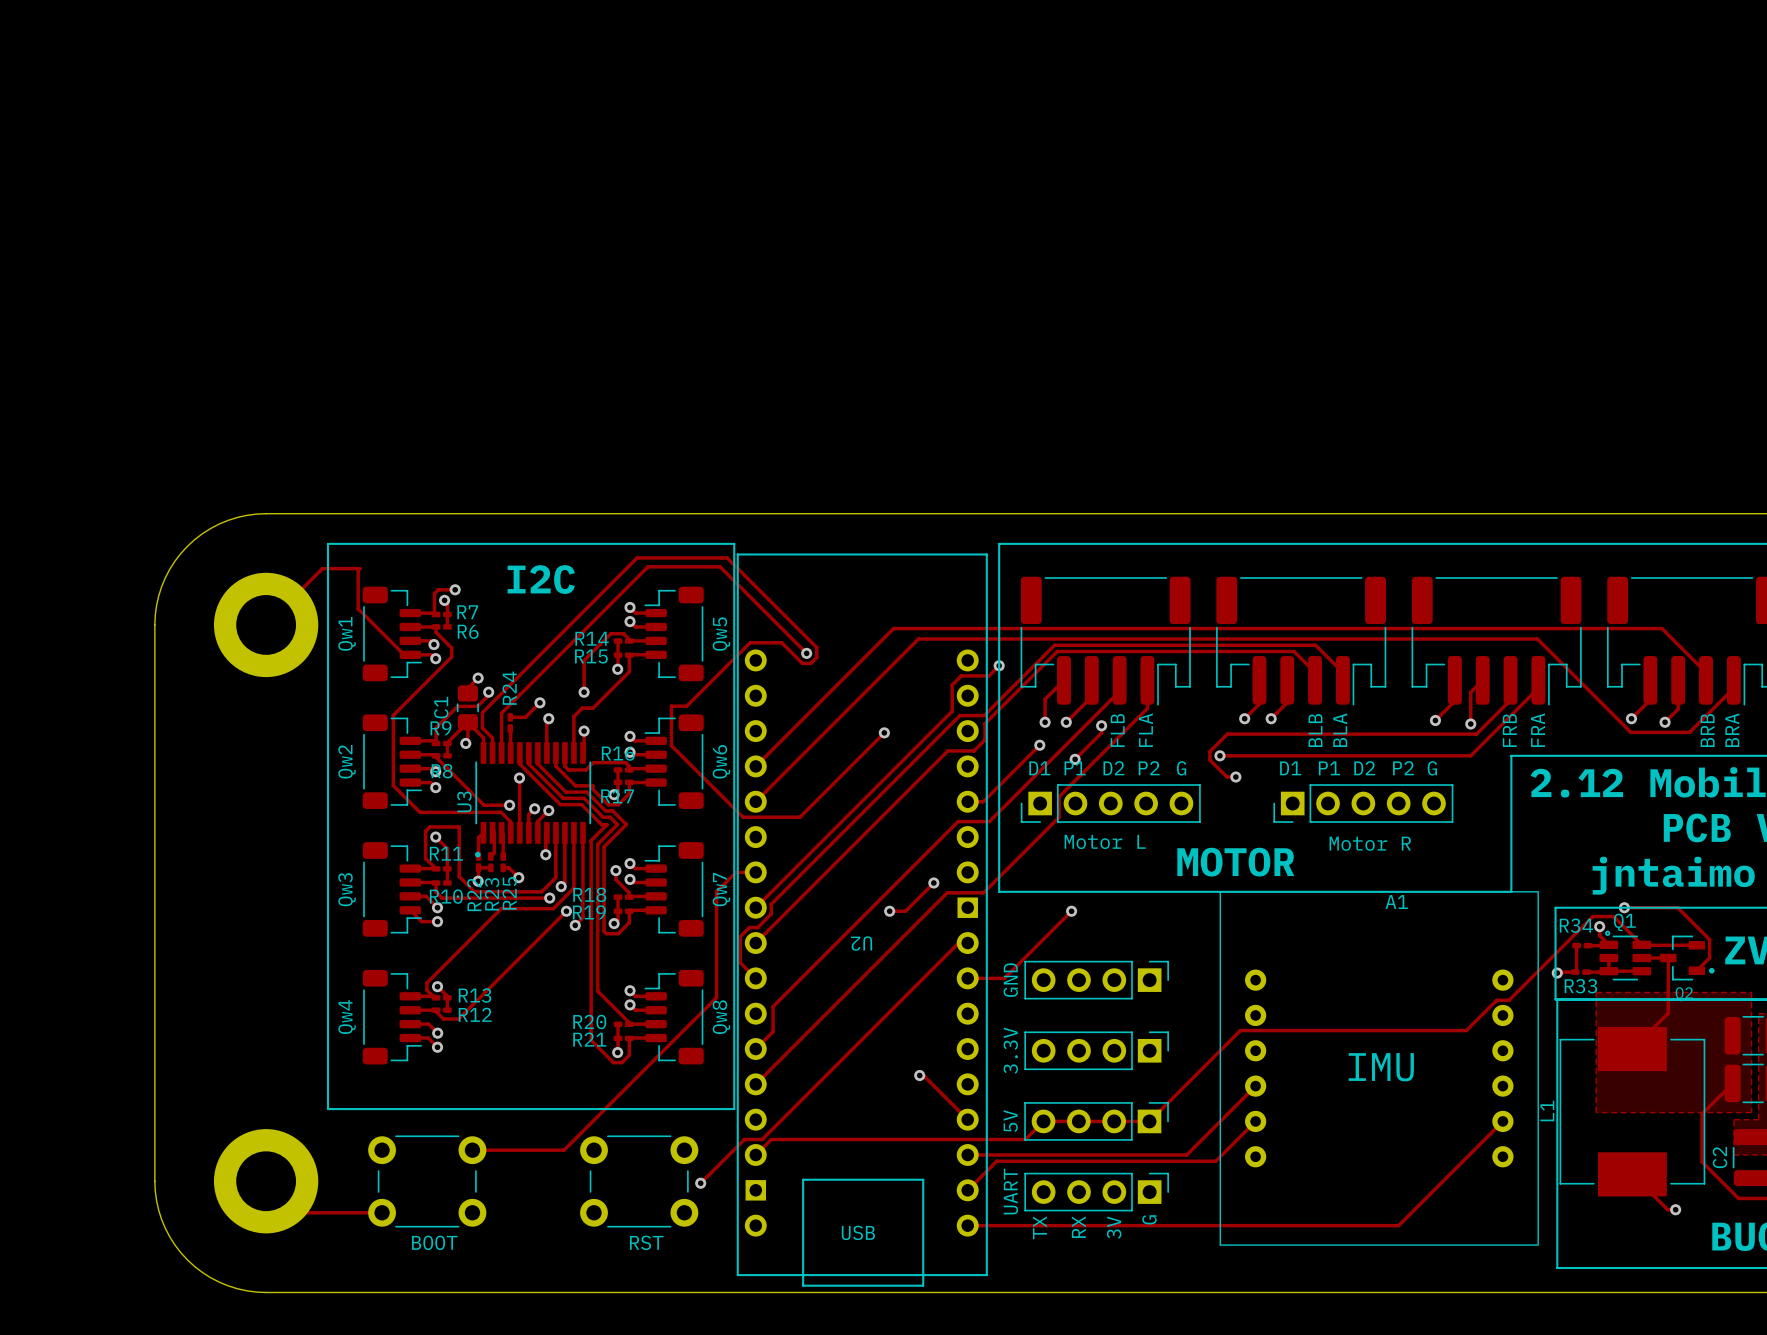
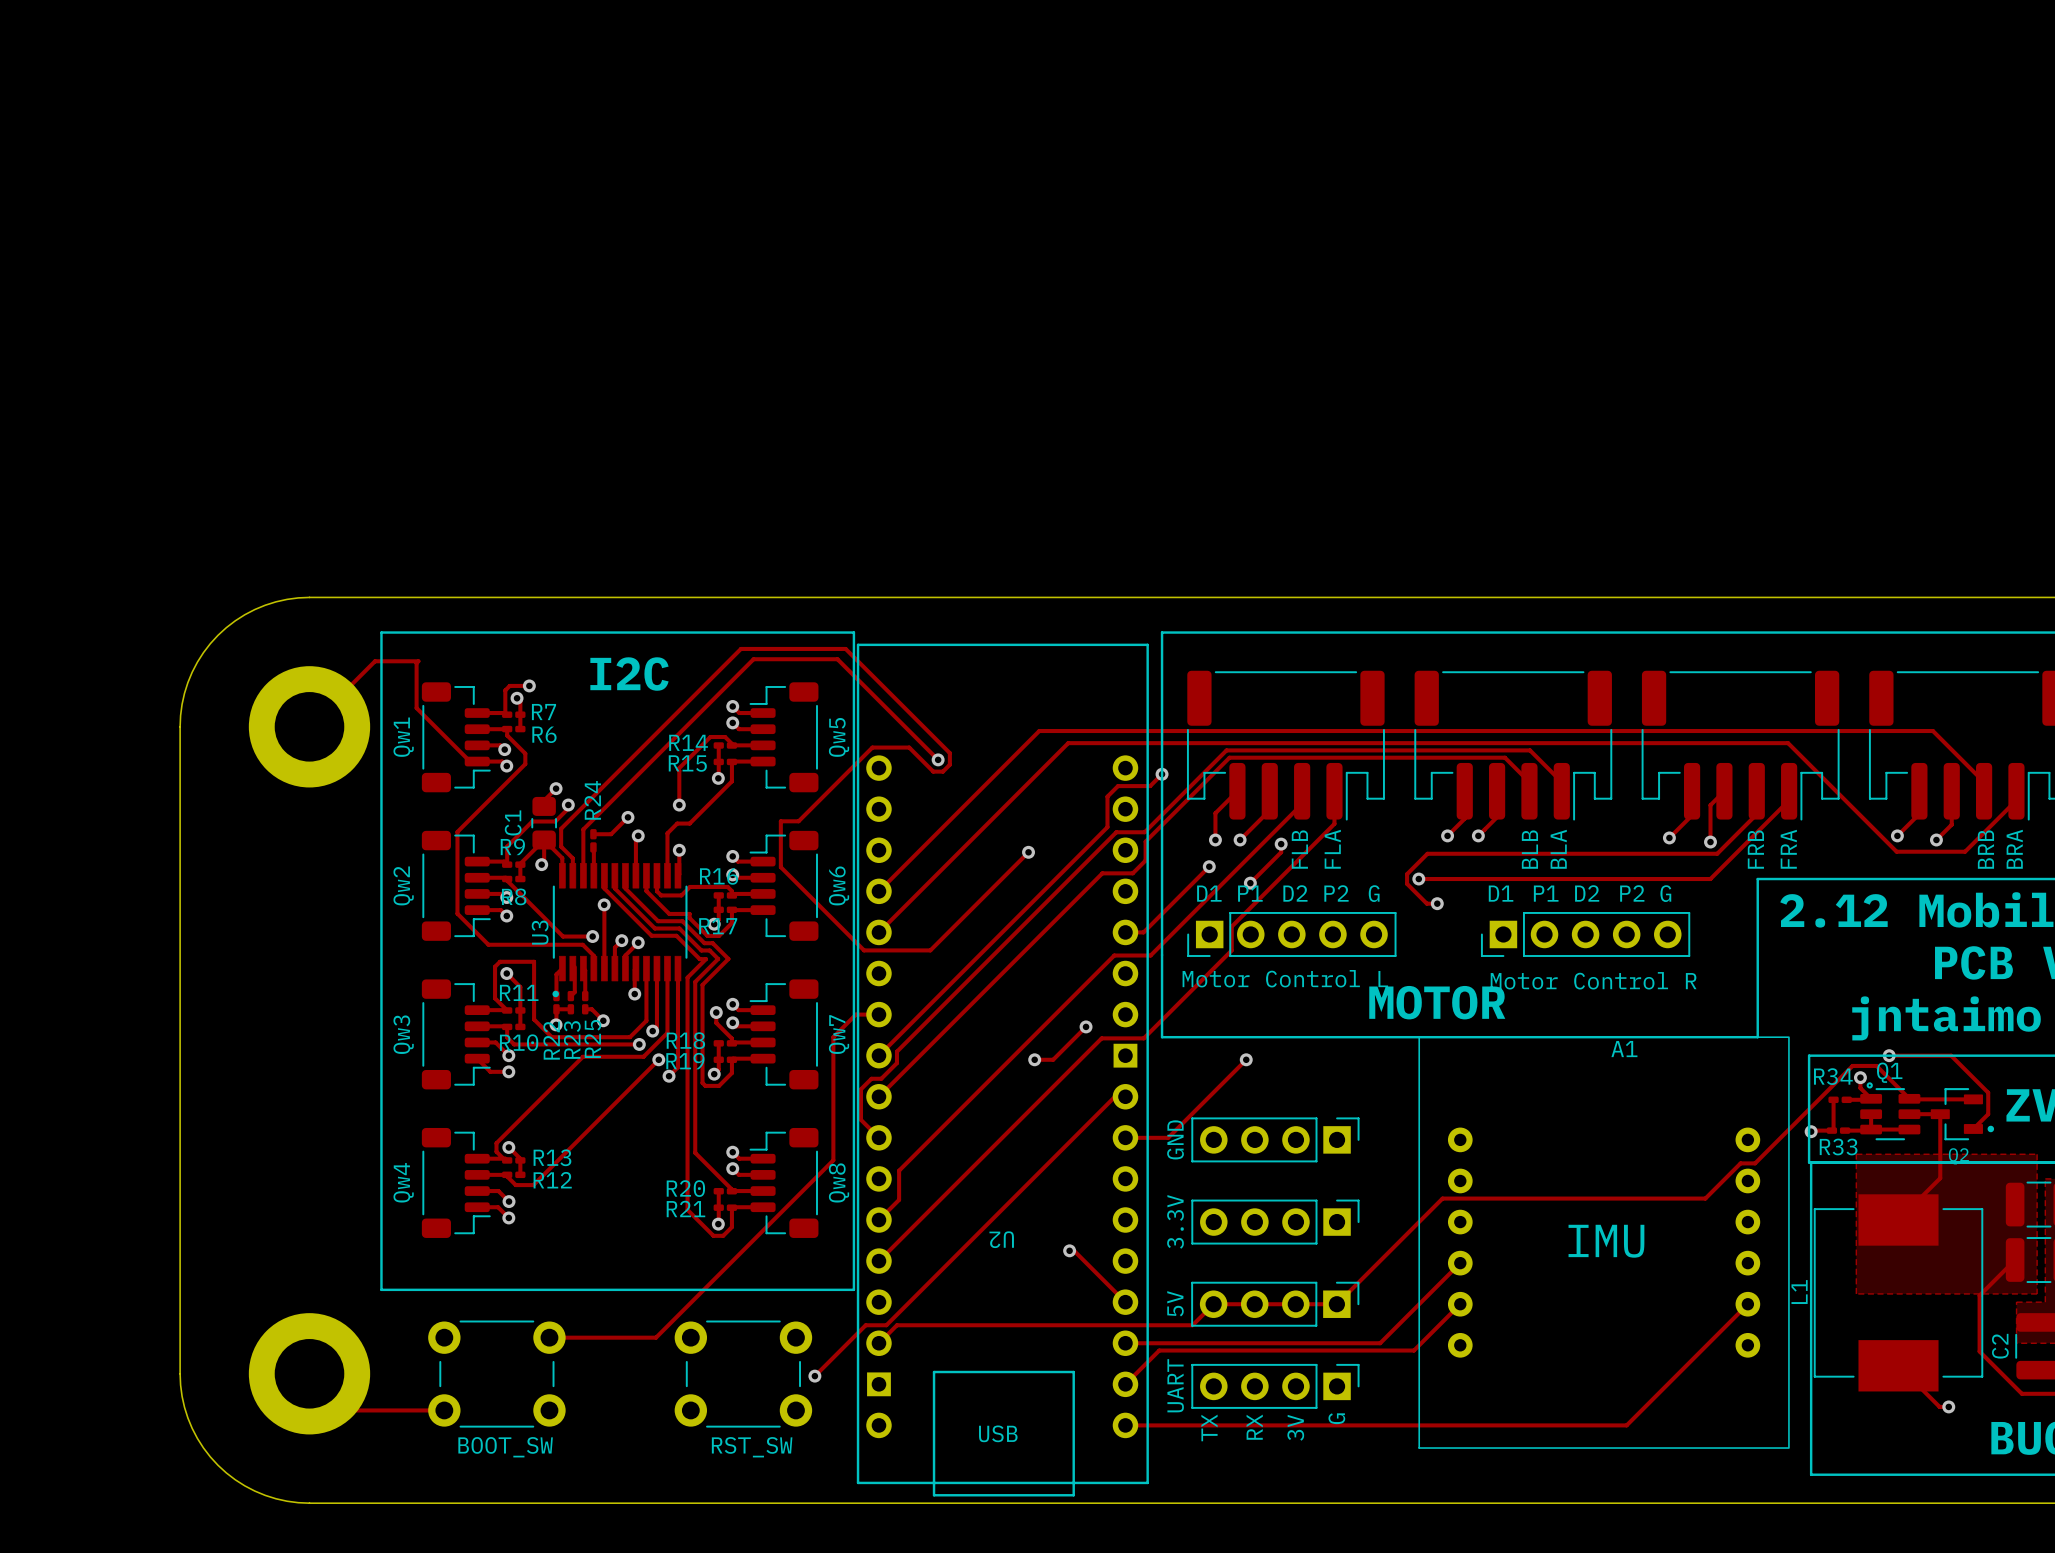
part value: Motor L (1105, 841) -> Motor Control L (1285, 978)
part value: Motor R (1370, 843) -> Motor Control R (1593, 980)
U2 name position: U2 (861, 943) -> U2 (1001, 1239)
part value: BOOT (434, 1242) -> BOOT_SW (505, 1447)
part value: RST (646, 1242) -> RST_SW (752, 1447)

